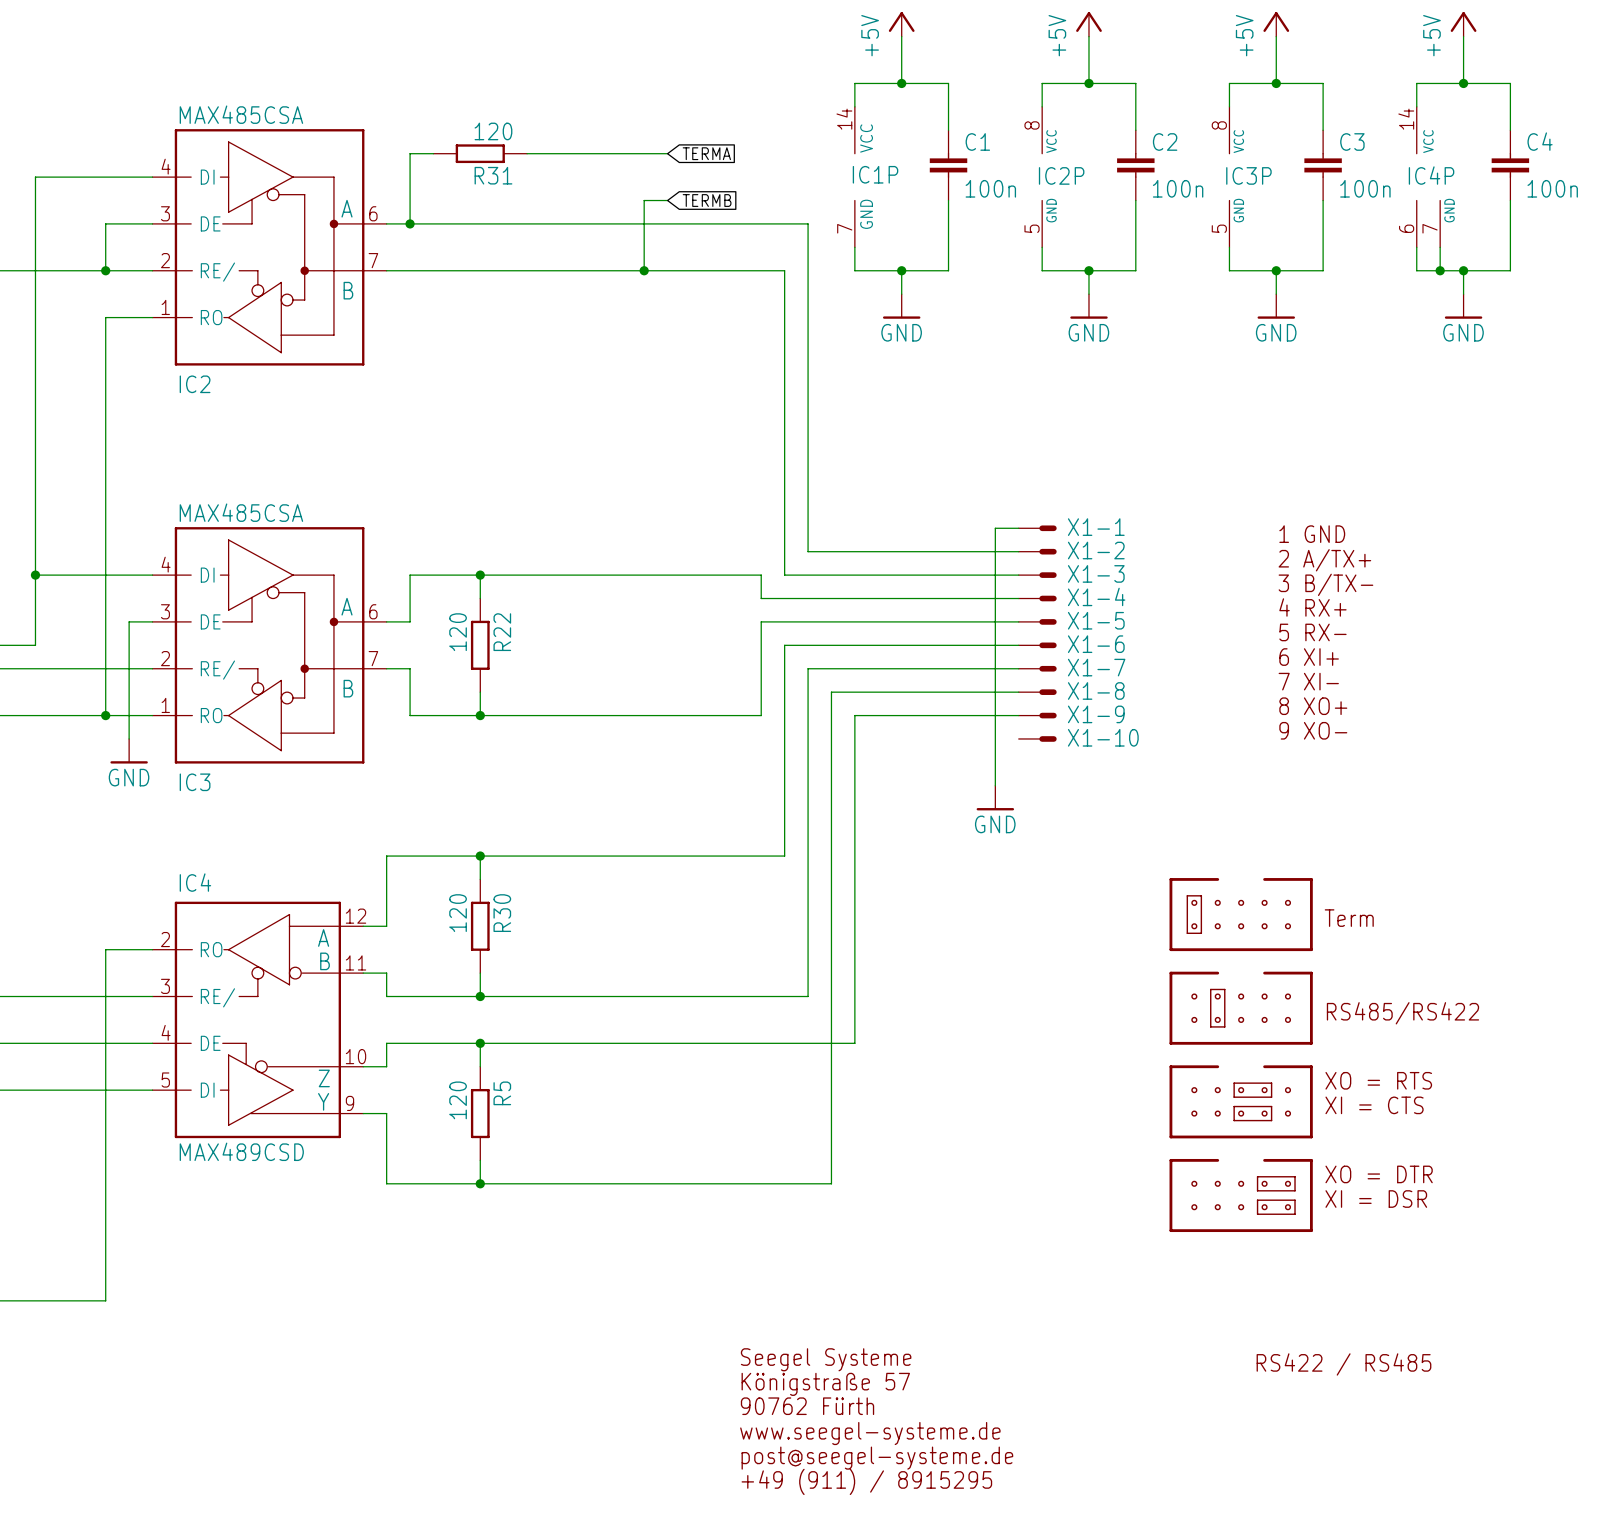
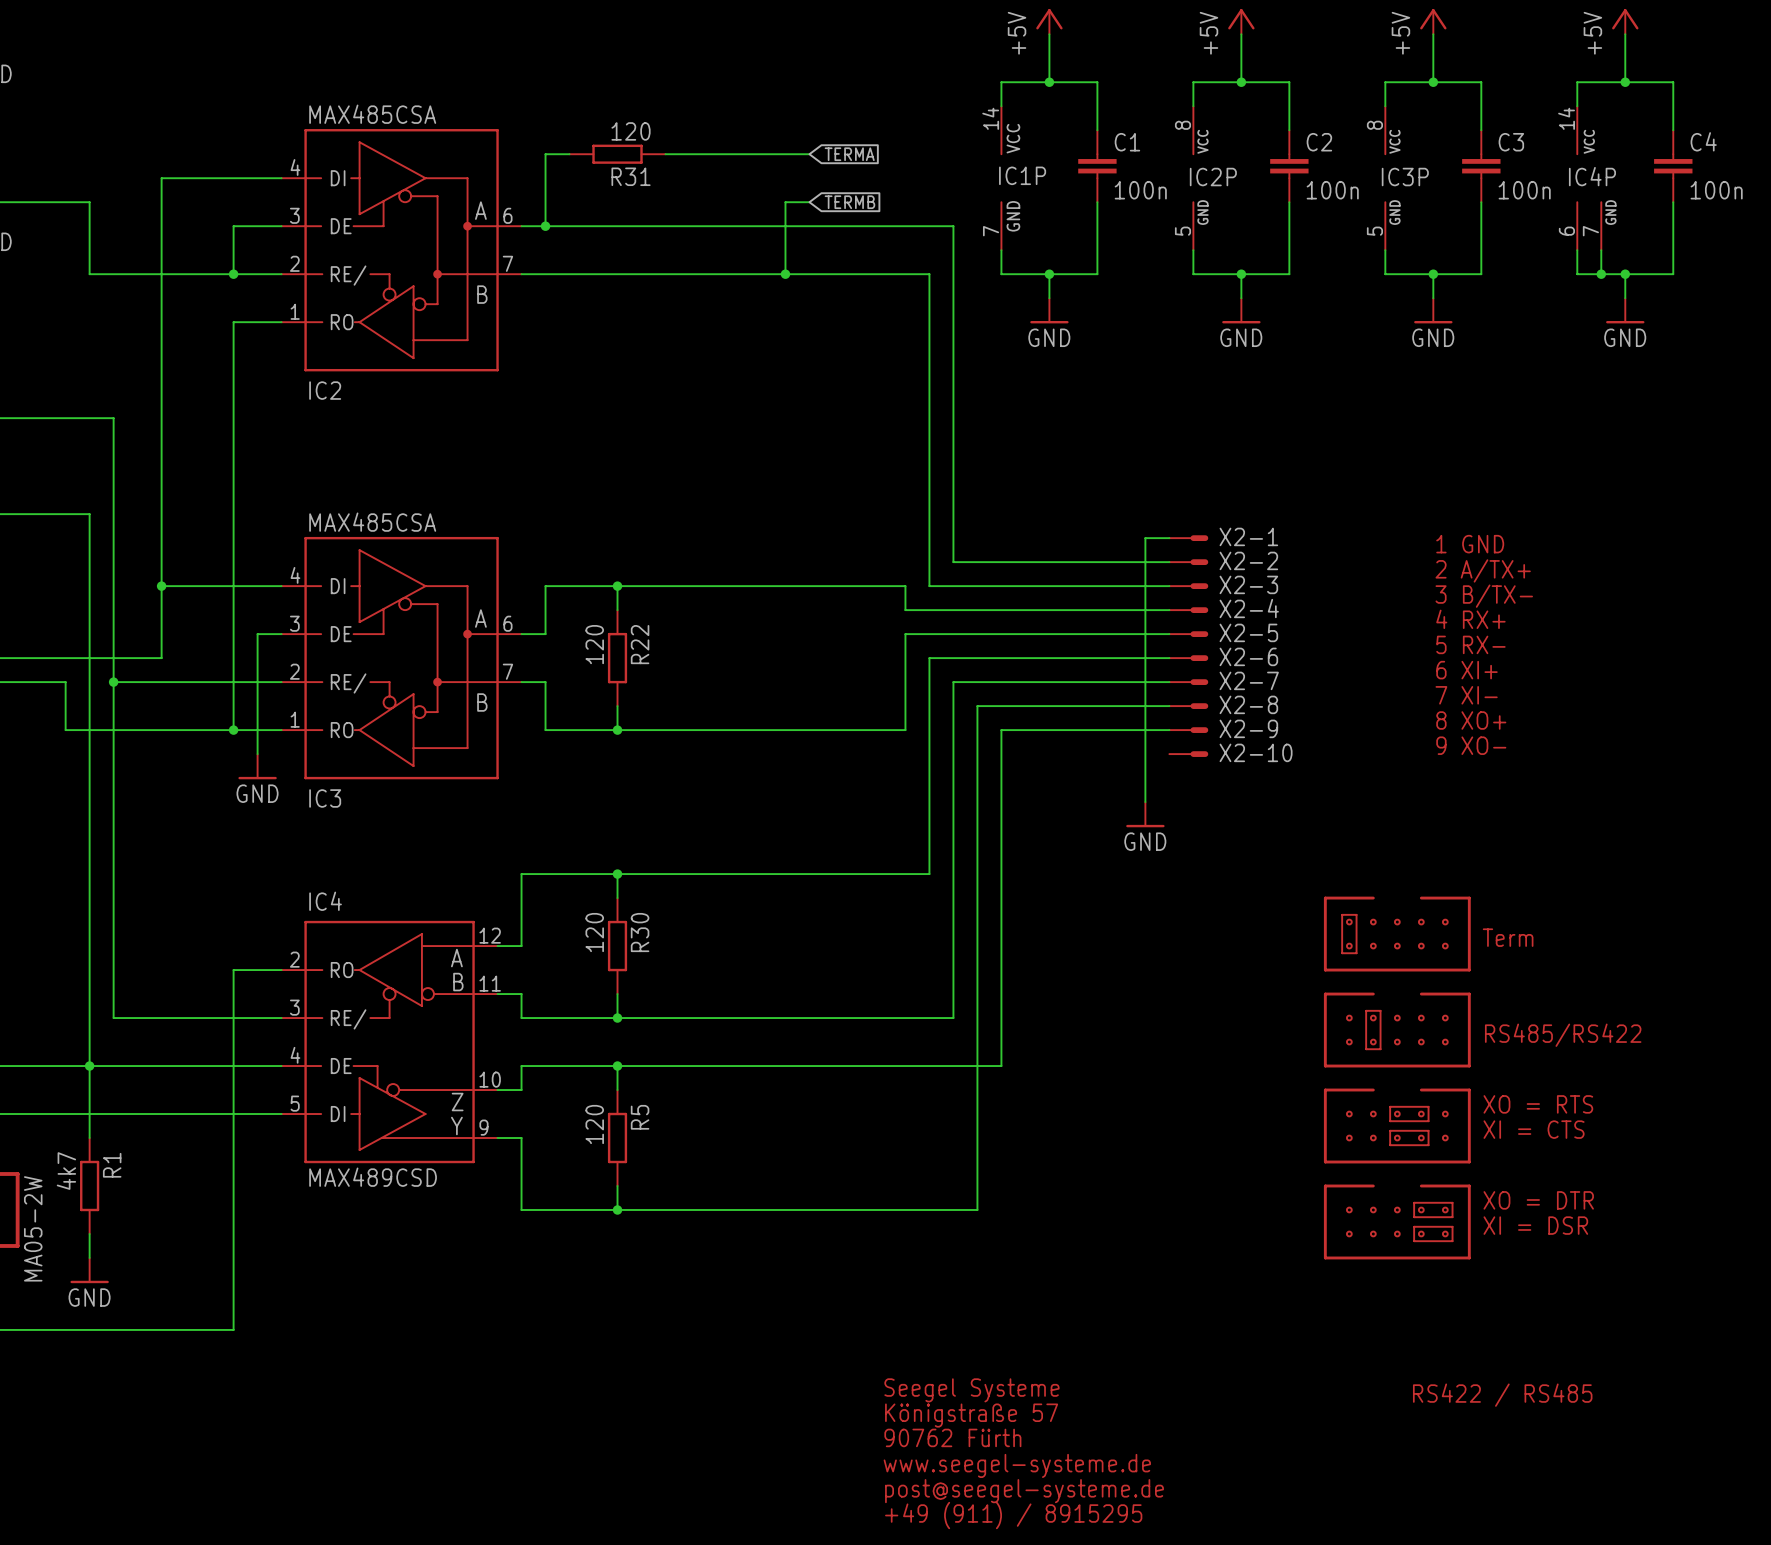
X1-1 name: X1-1 (1096, 527) -> X2-1 (1248, 536)
X1-2 name: X1-2 (1096, 550) -> X2-2 (1248, 560)
X1-3 name: X1-3 (1096, 573) -> X2-3 (1248, 584)
X1-4 name: X1-4 (1096, 596) -> X2-4 (1249, 608)
X1-5 name: X1-5 (1096, 620) -> X2-5 (1248, 632)
X1-6 name: X1-6 (1096, 644) -> X2-6 (1248, 656)
X1-7 name: X1-7 (1096, 667) -> X2-7 (1249, 680)
X1-8 name: X1-8 (1096, 690) -> X2-8 (1248, 704)
X1-9 name: X1-9 (1096, 714) -> X2-9 (1248, 728)
X1-10 name: X1-10 (1103, 737) -> X2-10 (1256, 752)

